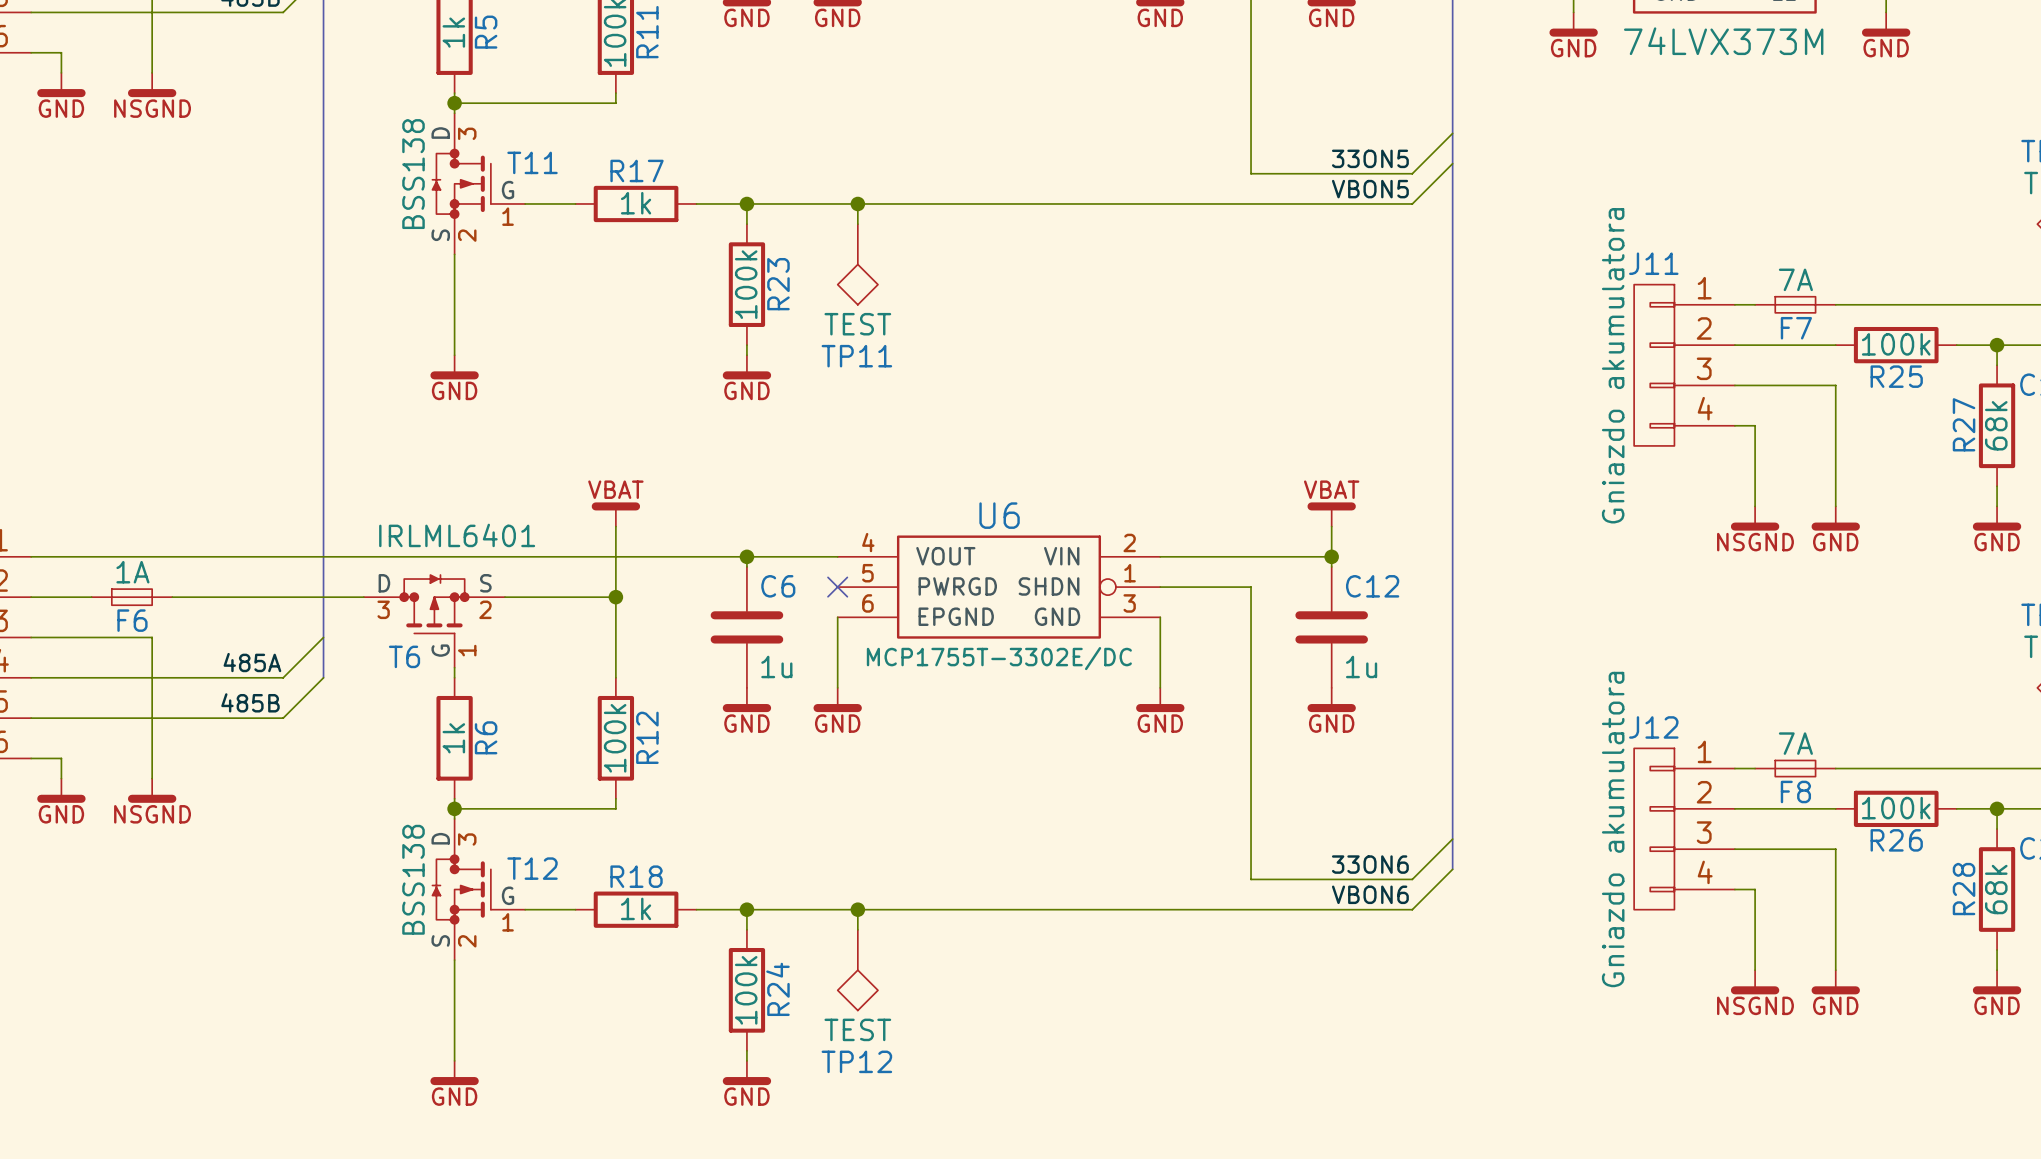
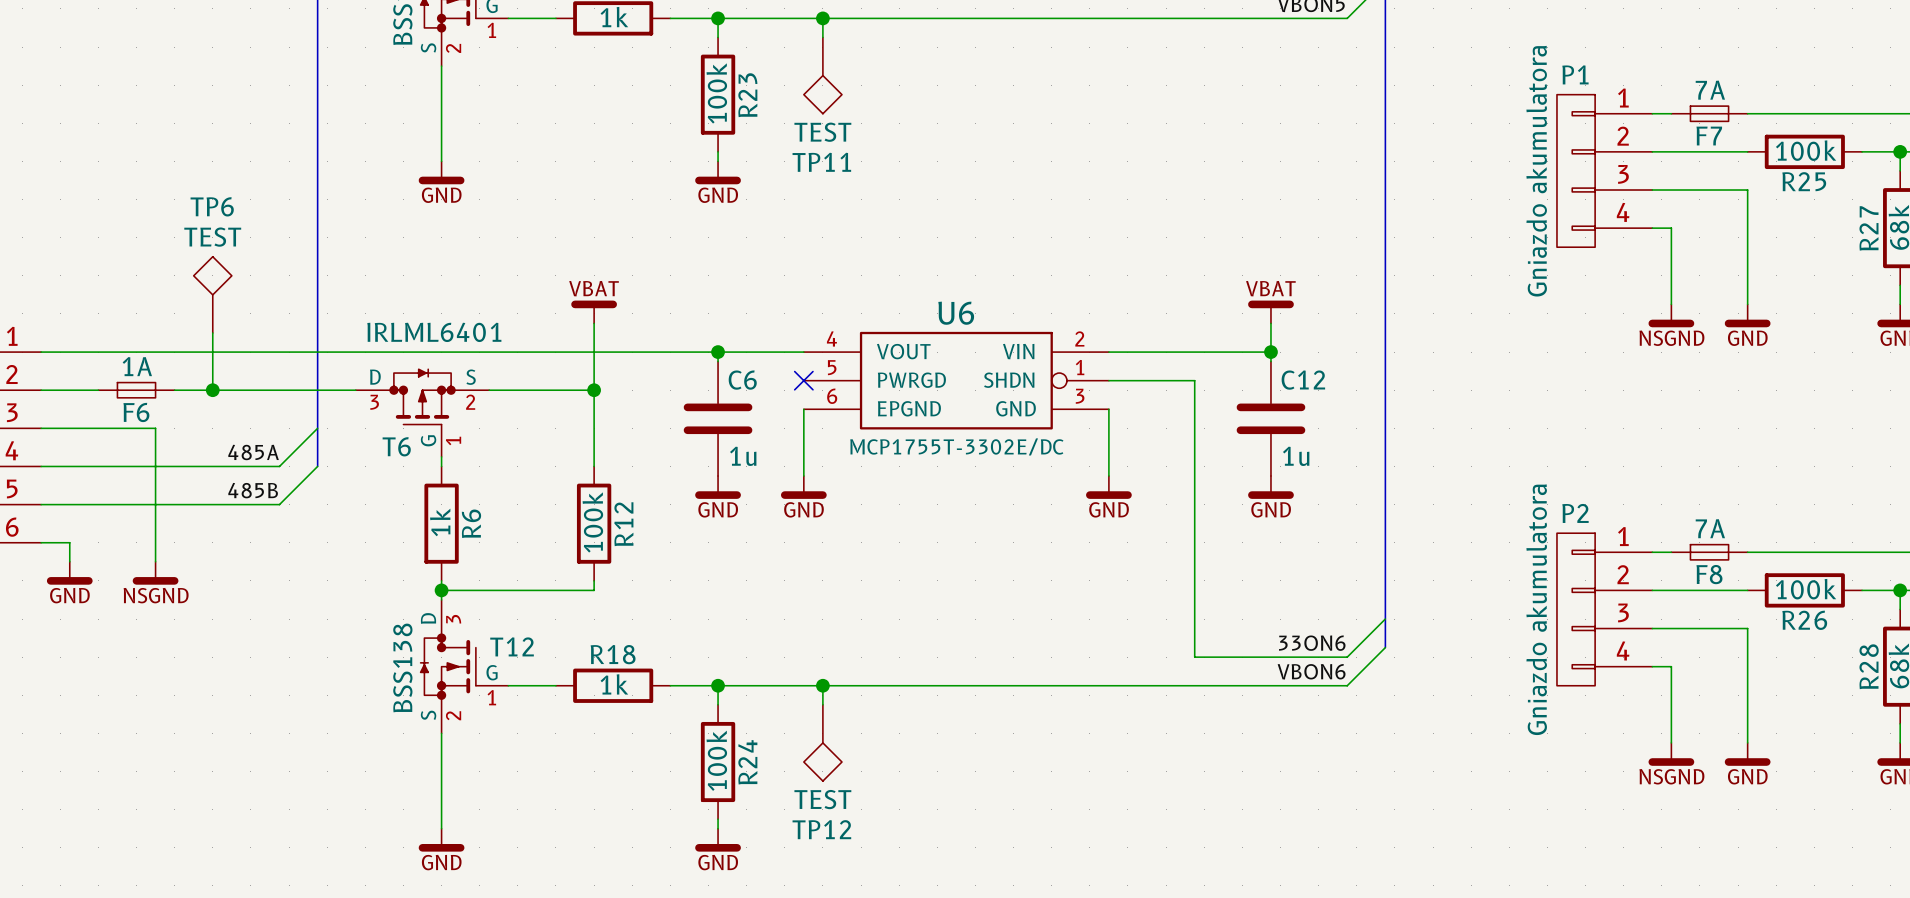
J11 name: J11 (1653, 263) -> P1 (1575, 74)
TP6: none -> TEST (212, 294)
wire: none -> (212, 333) (212, 390)
junction: none -> (212, 390)
J12 name: J12 (1653, 727) -> P2 (1575, 513)

